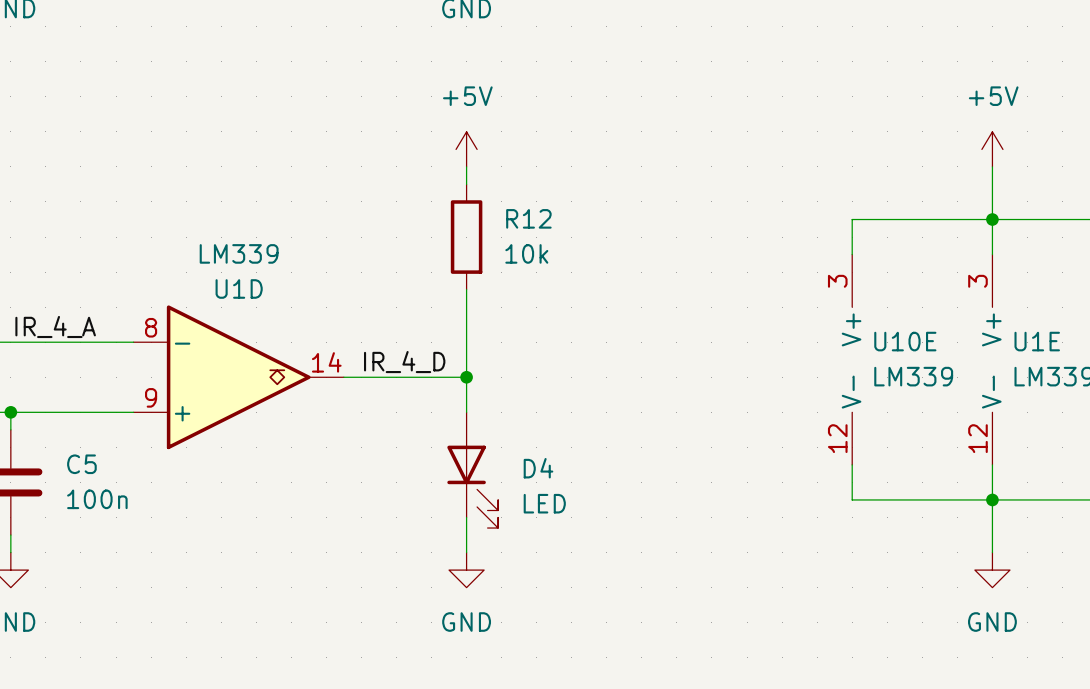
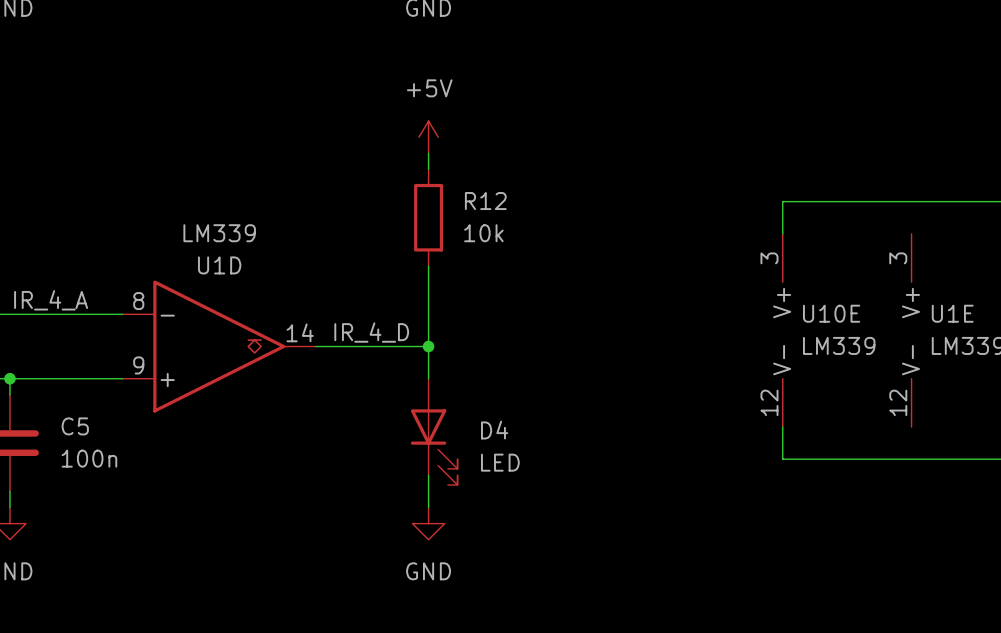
power symbol: +5V (992, 149) -> none
wire: (992, 166) (992, 254) -> none
junction: (992, 219) -> none
wire: (992, 464) (992, 552) -> none
junction: (992, 499) -> none
power symbol: GND (992, 570) -> none

